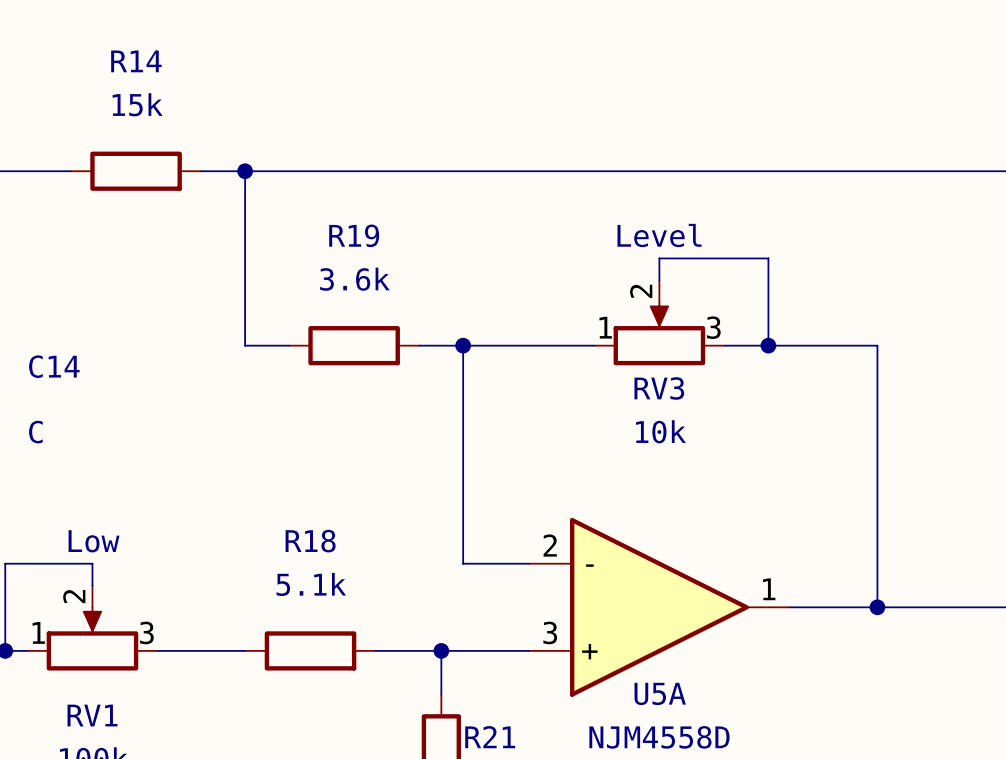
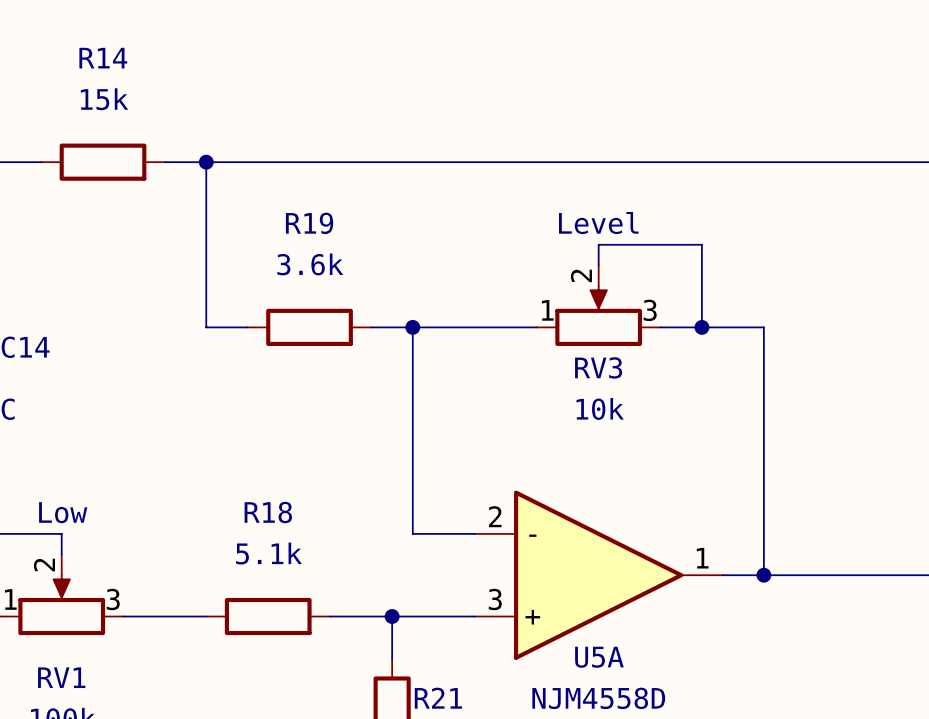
wire: (833, 345) (877, 345) (877, 607) -> (763, 327) (763, 575)
junction position: (877, 607) -> (763, 575)

